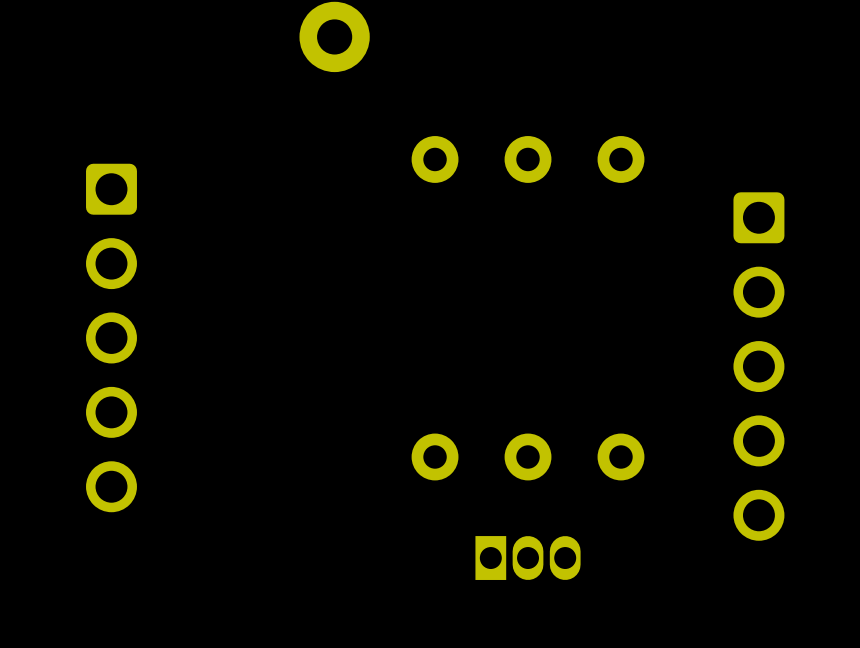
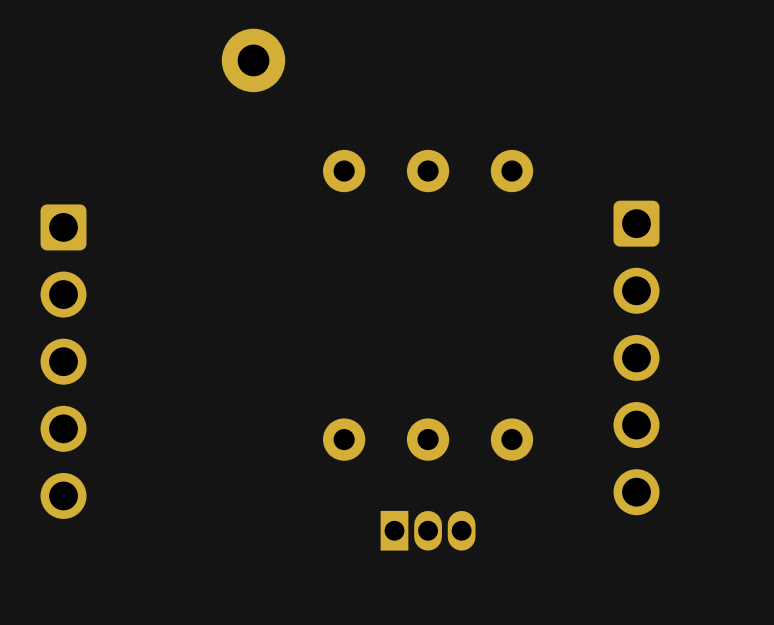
part position: (111, 337) -> (63, 361)

